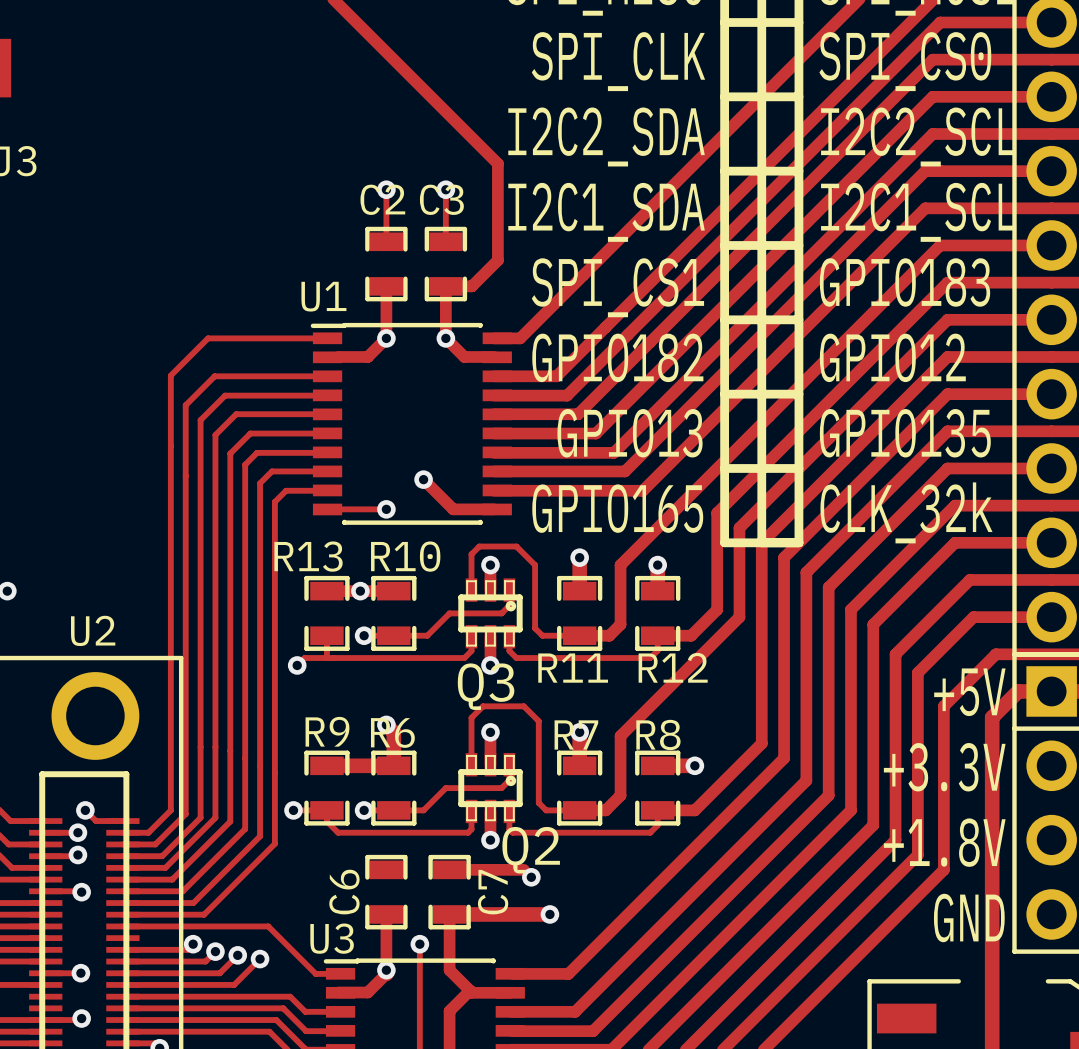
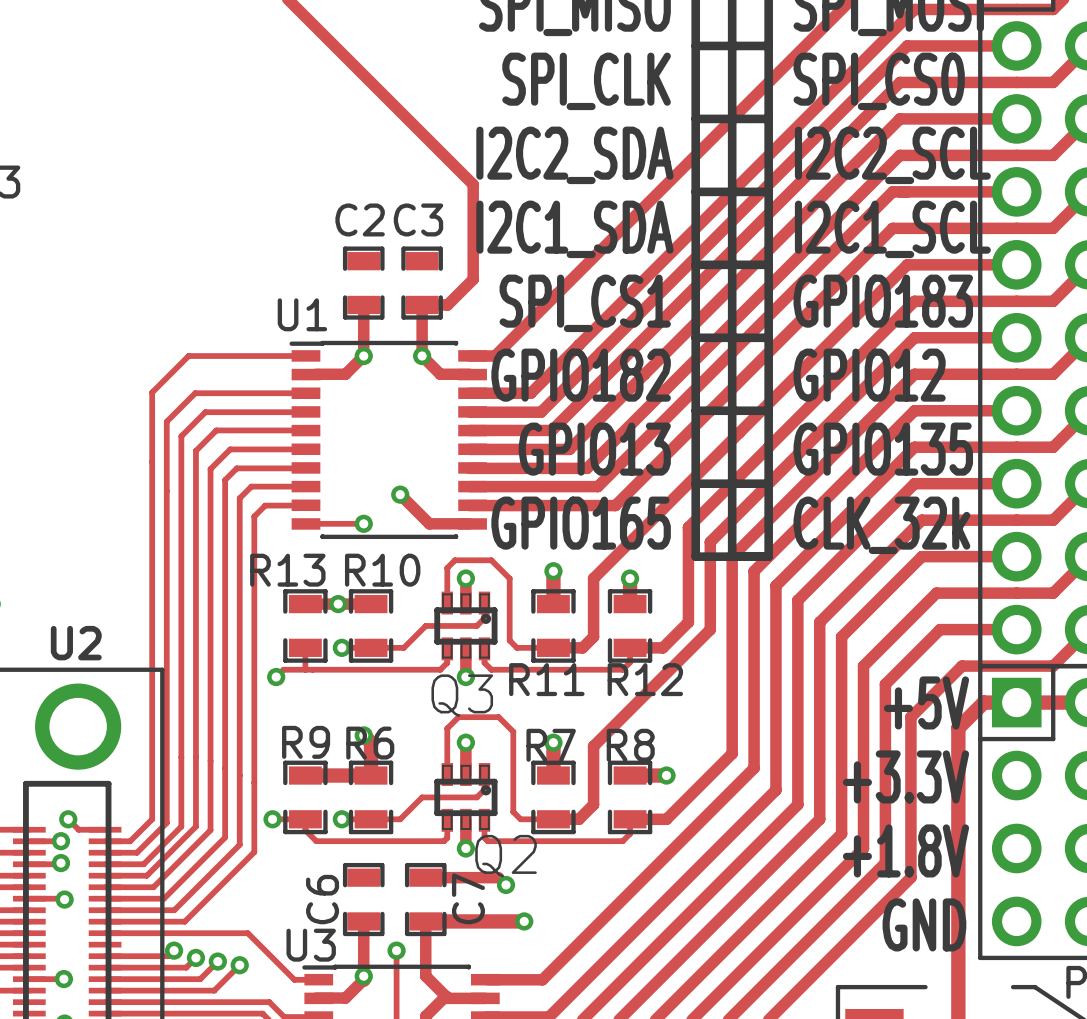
track: (386, 189) (386, 241) -> none
via: (386, 189) -> none
track: (445, 189) (445, 241) -> none
via: (445, 189) -> none

